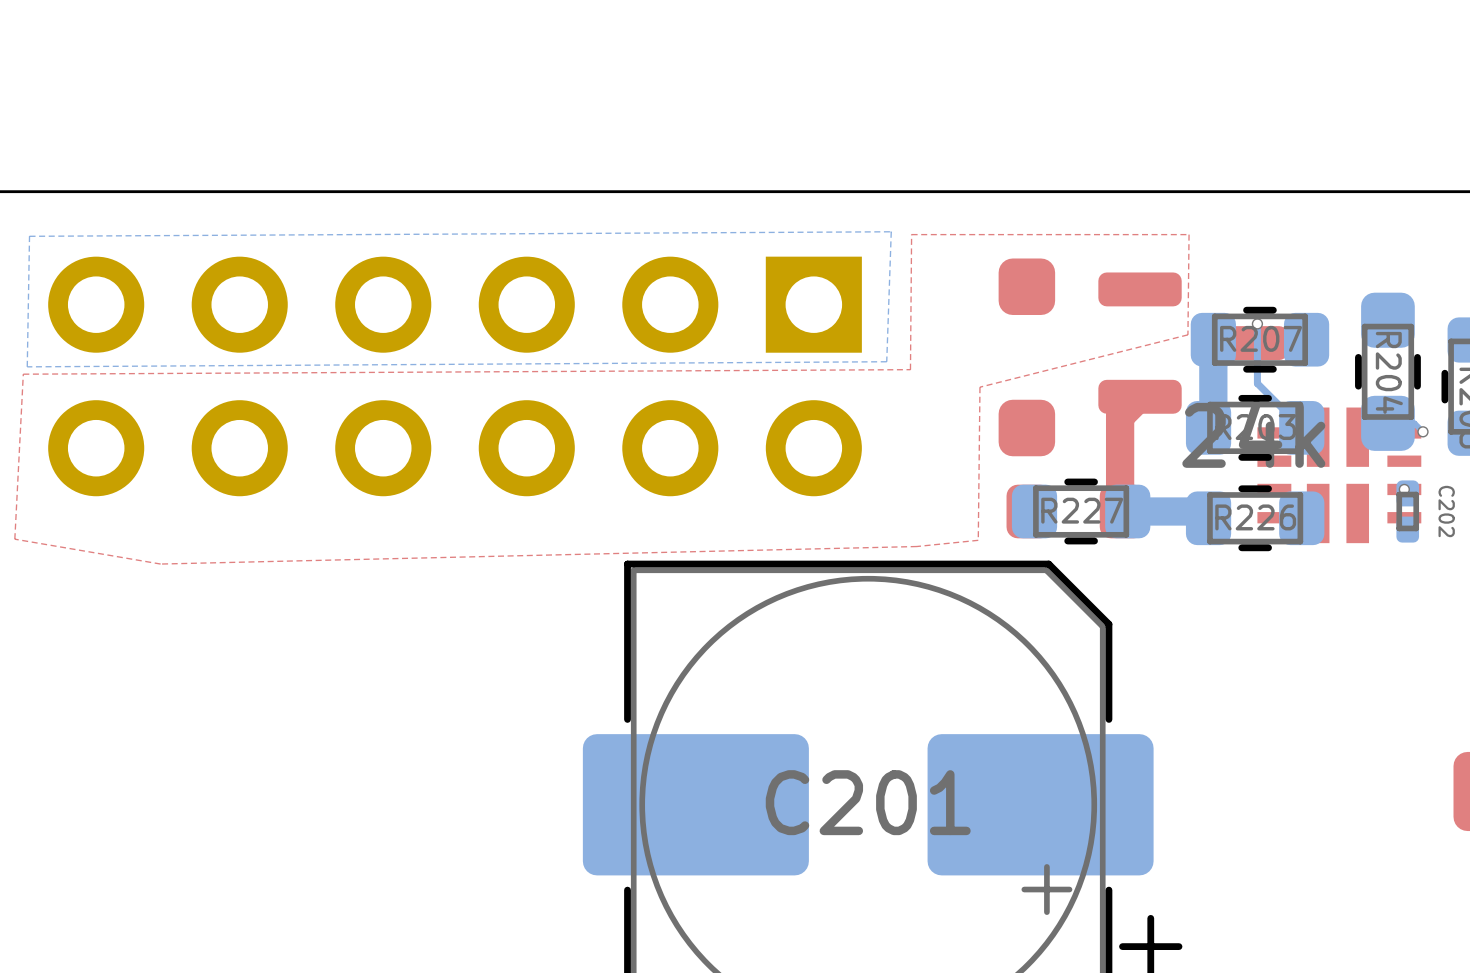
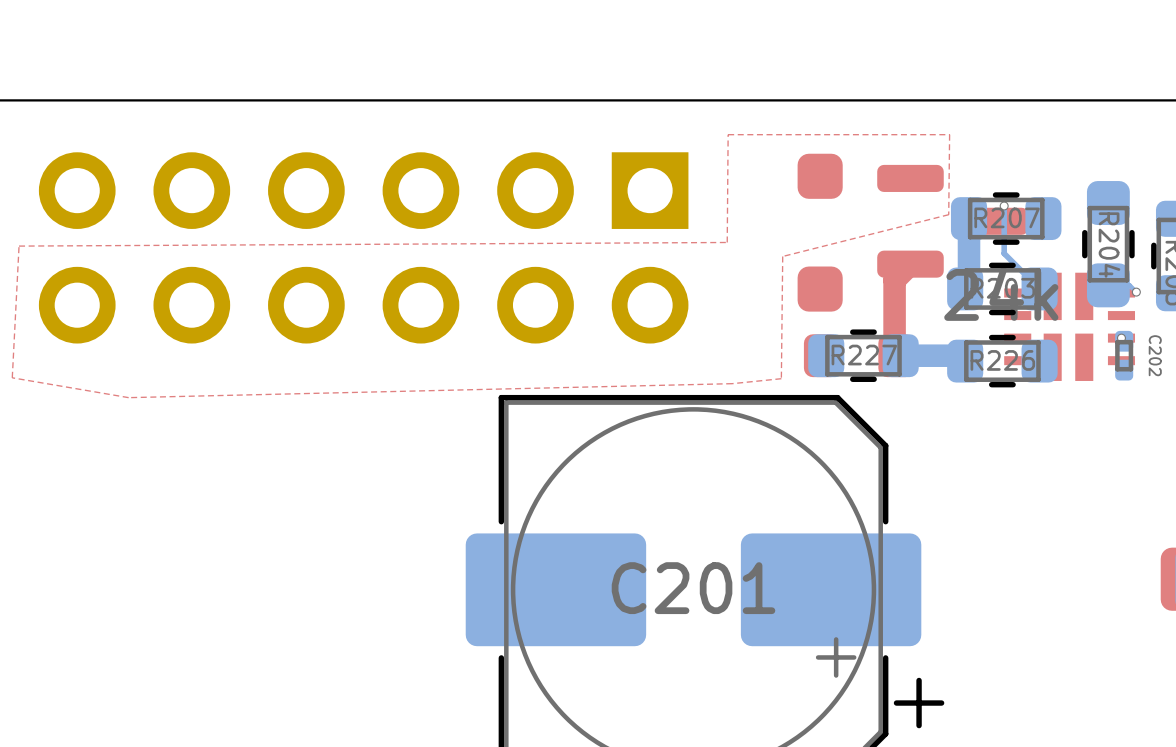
bottom zone outline: (891, 231) (886, 361) (27, 366) (29, 236) (890, 231) -> none

